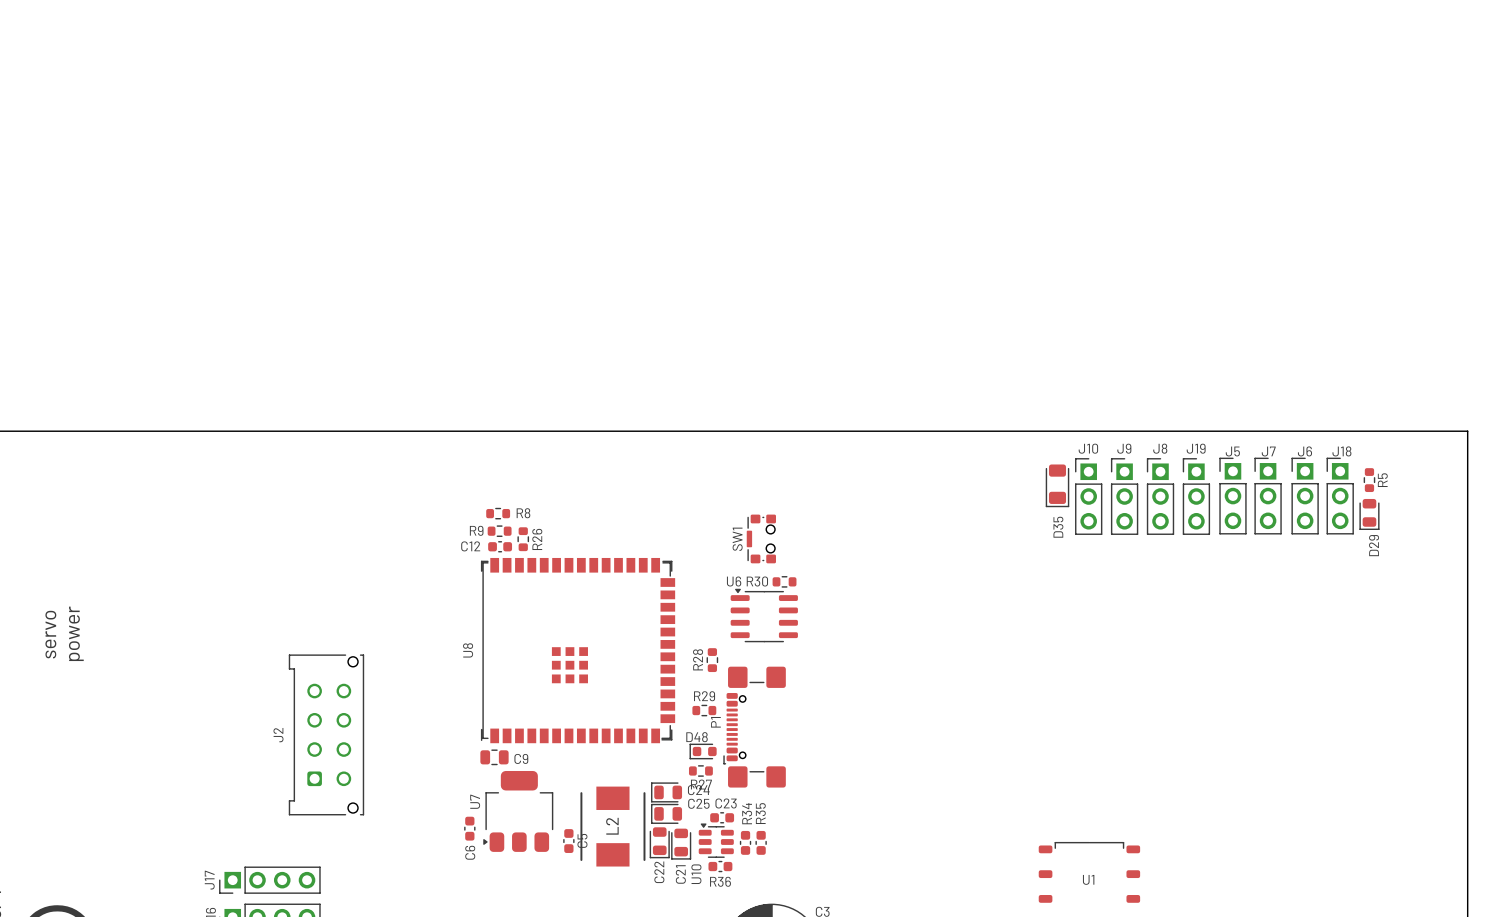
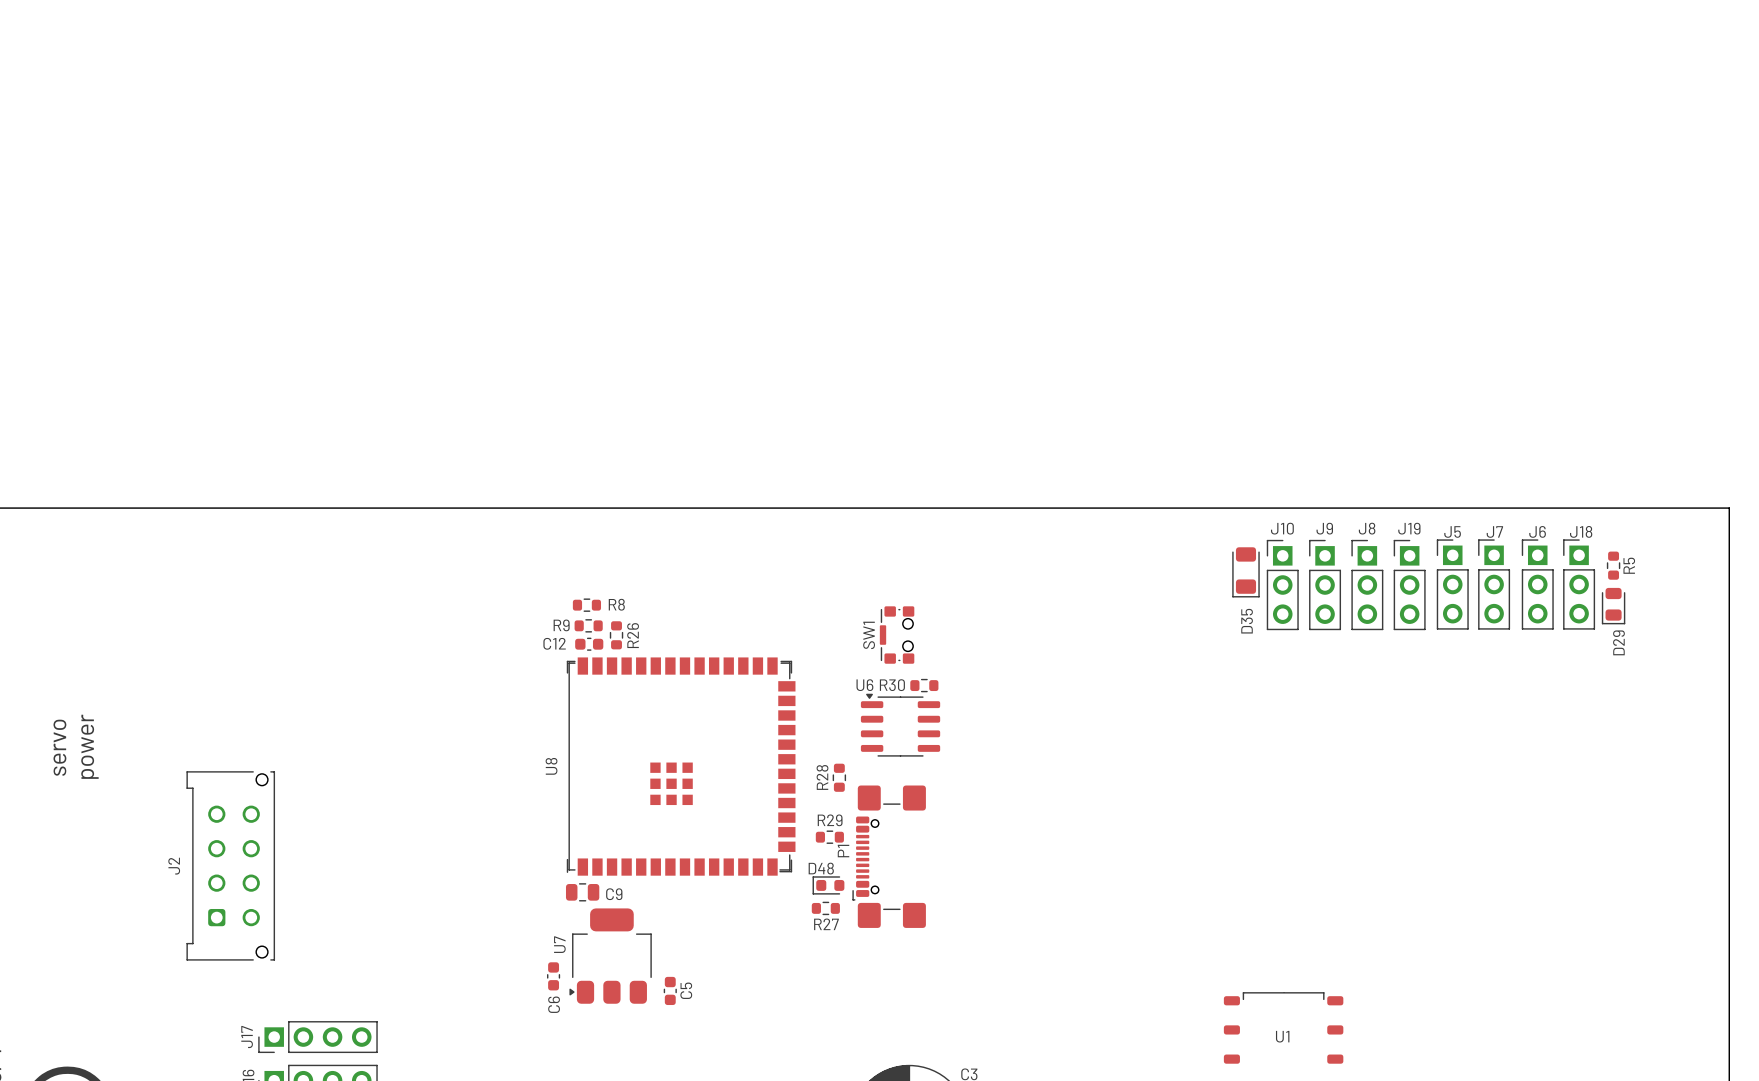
J2 position: (326, 734) -> (230, 865)
C24: (666, 792) -> none
C25: (666, 813) -> none
C23: (722, 817) -> none
L2: (612, 826) -> none
U10: (716, 840) -> none
C22: (659, 842) -> none
R34: (745, 842) -> none
R35: (761, 842) -> none
C21: (681, 844) -> none
R36: (720, 866) -> none

